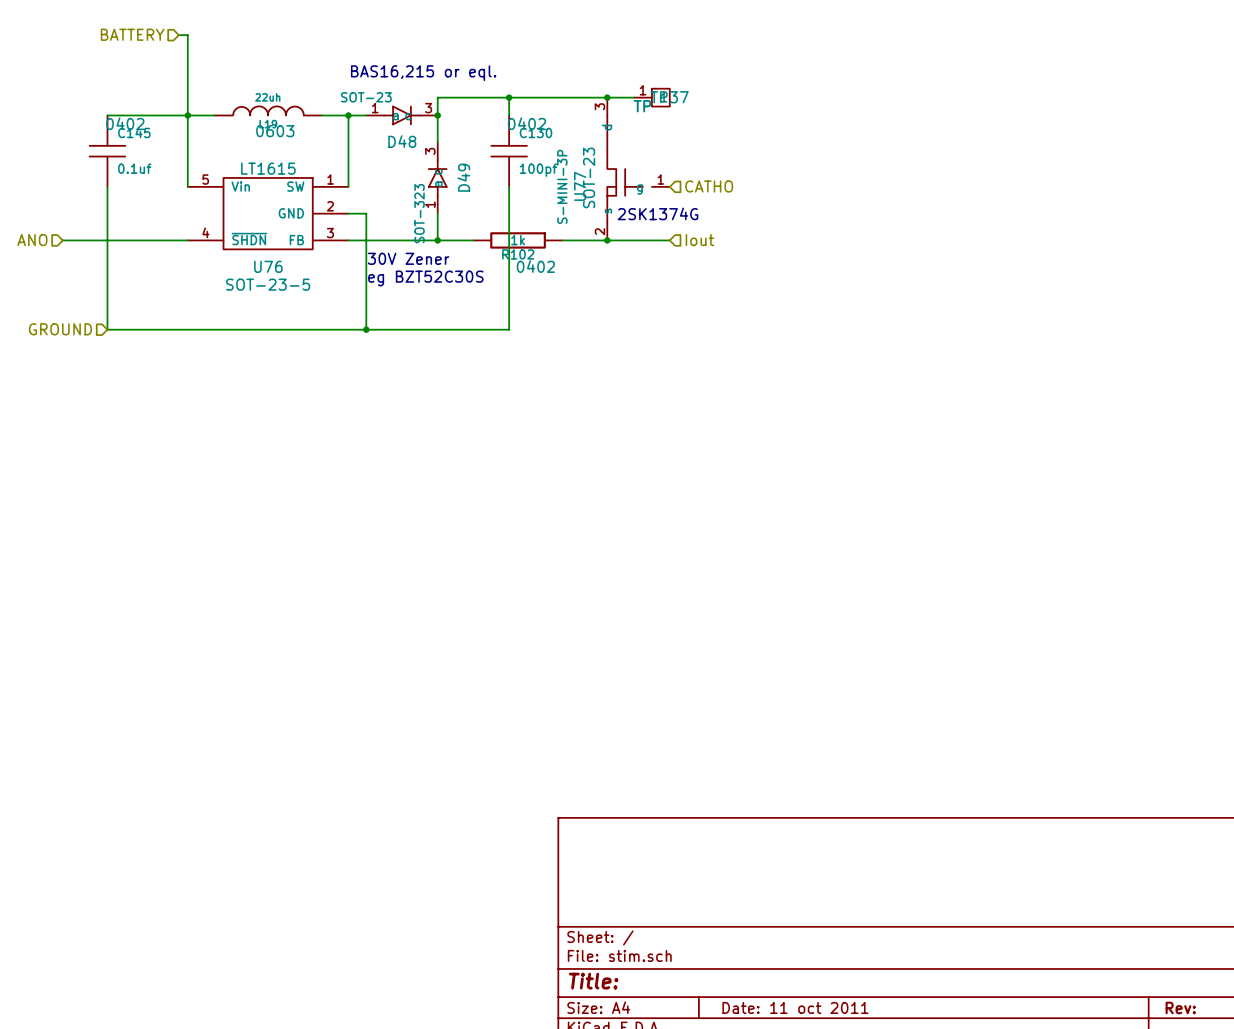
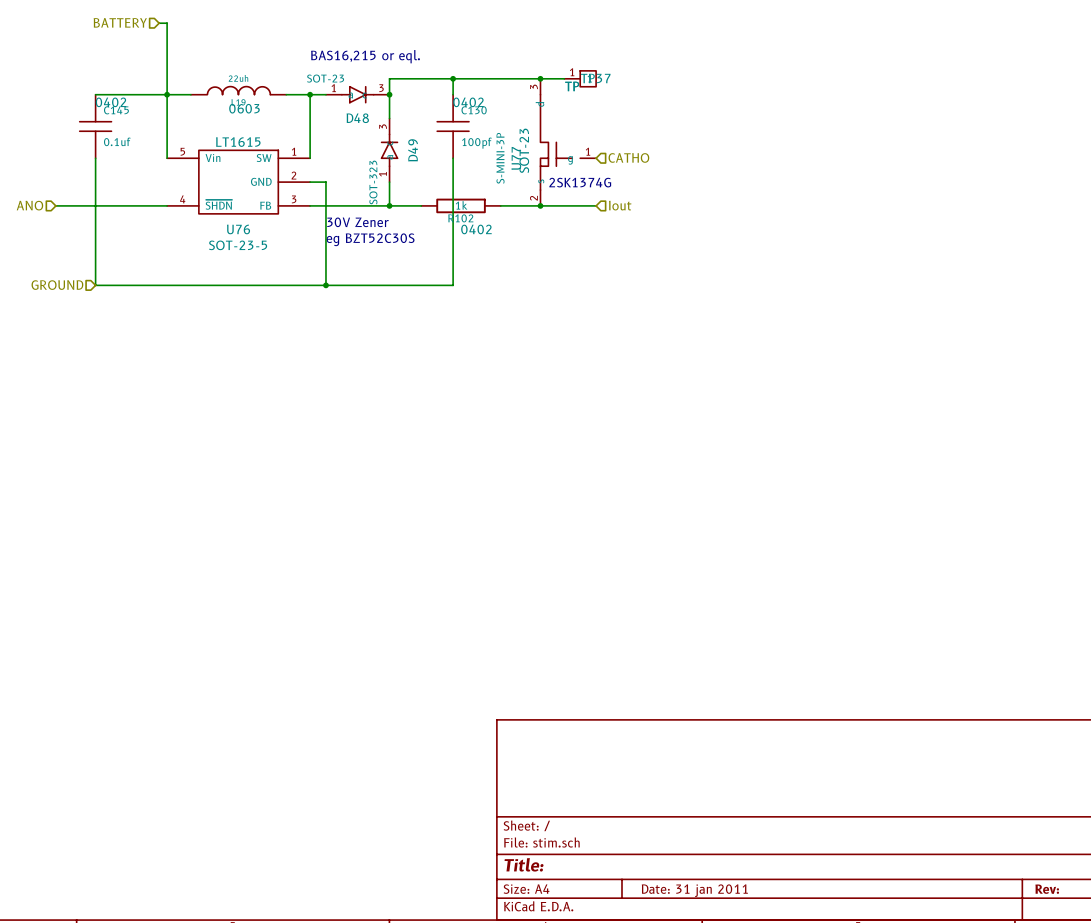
title block: Date: 11 oct 2011 (795, 1007) -> Date: 31 jan 2011 (694, 890)

